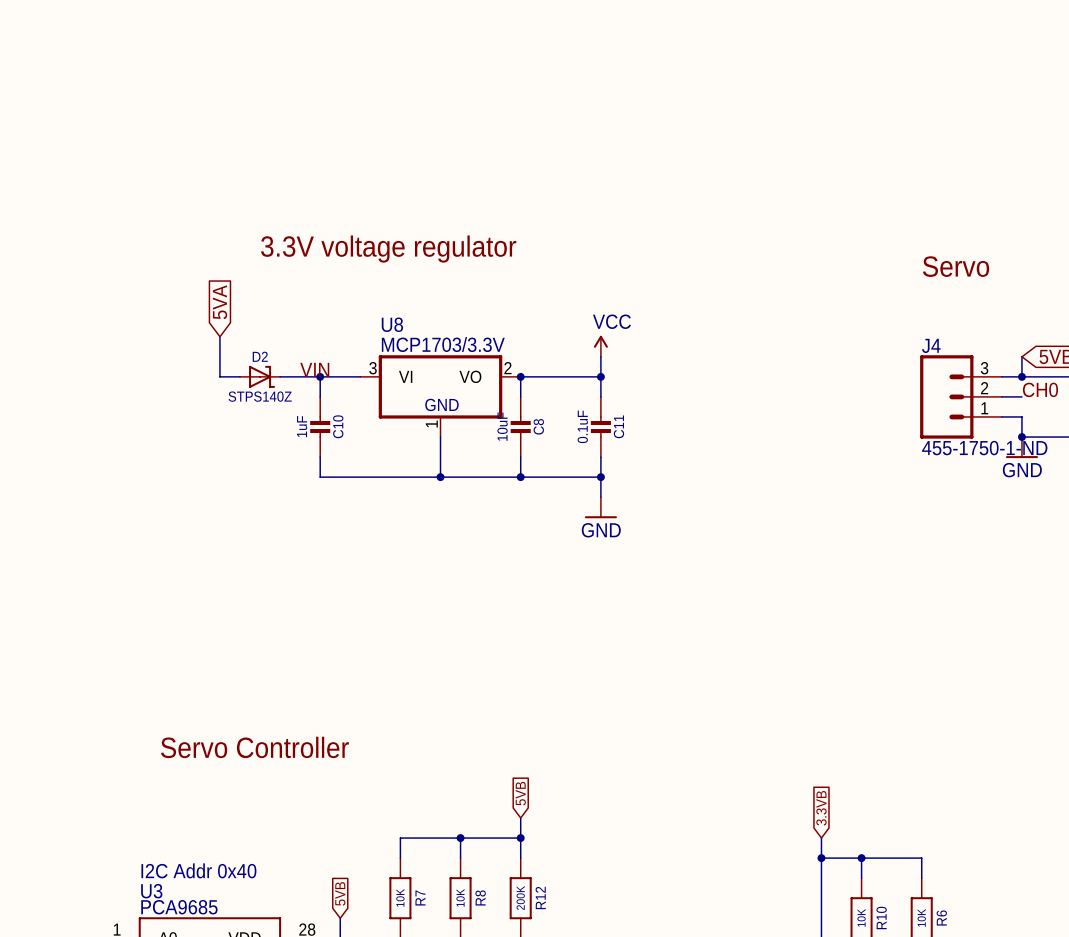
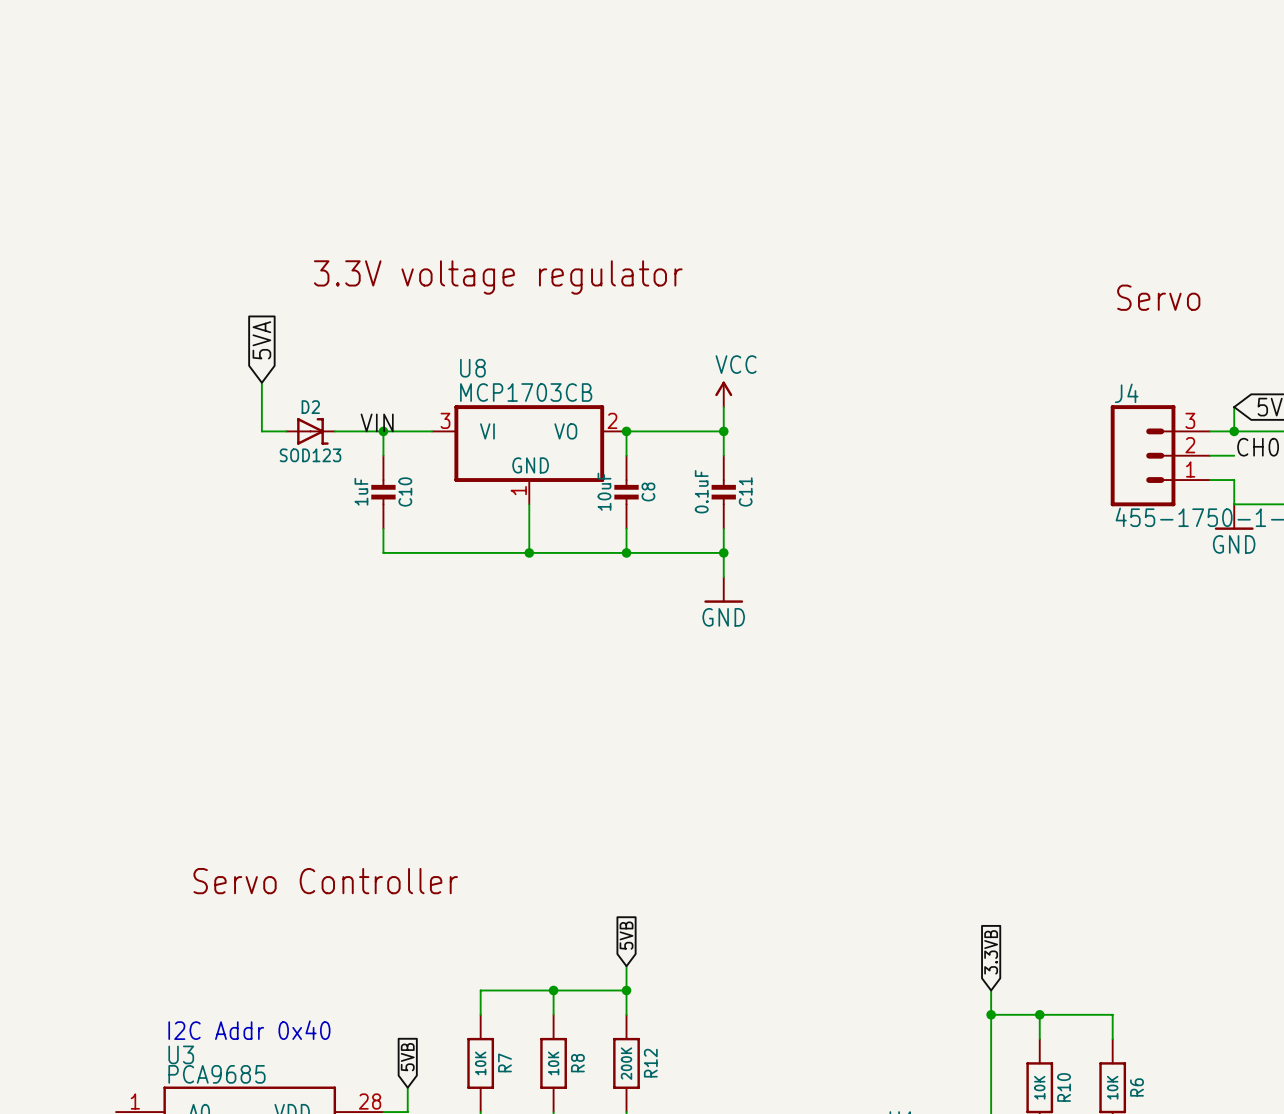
U8 value: MCP1703/3.3V (443, 344) -> MCP1703CB (526, 392)
D2 value: STPS140Z (260, 396) -> SOD123 (310, 455)
junction: (1021, 437) -> none

